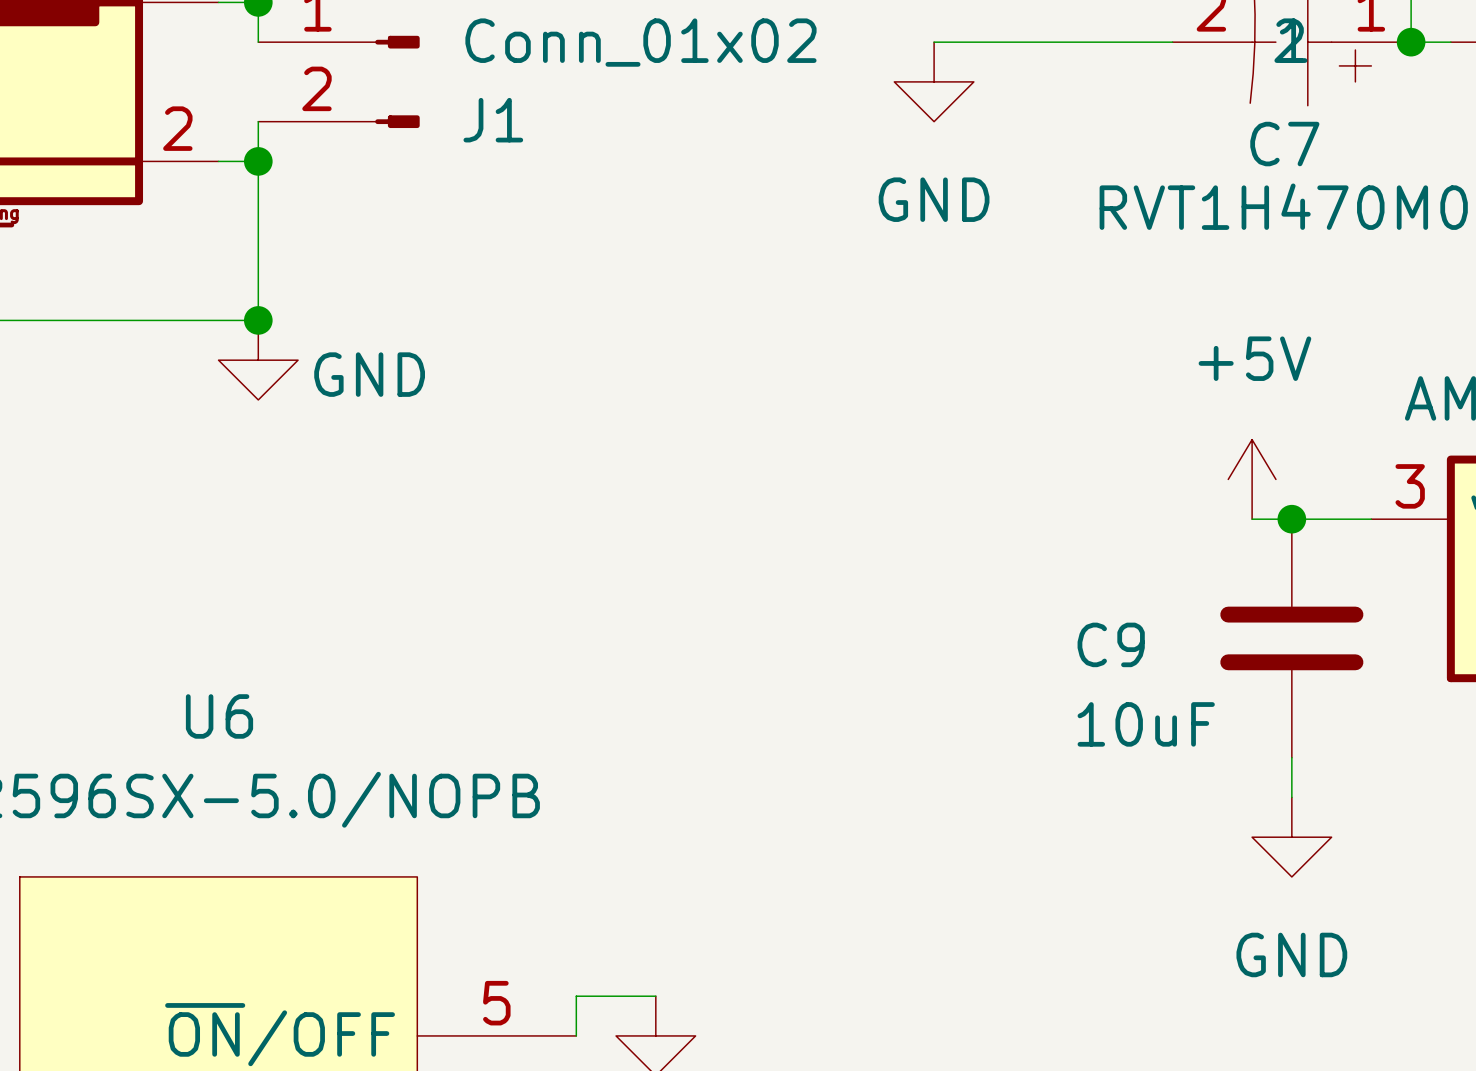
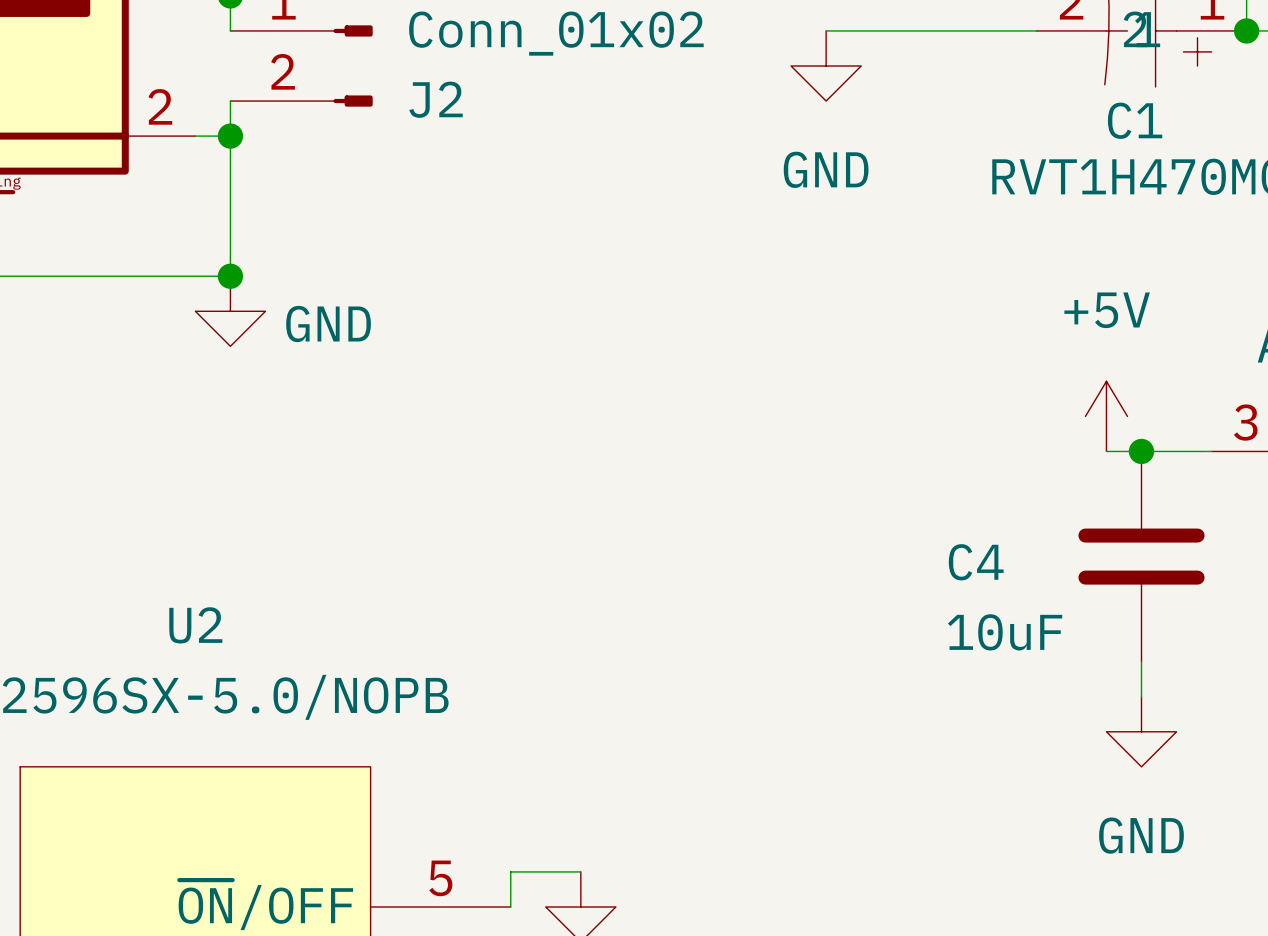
J1 name: J1 (493, 120) -> J2 (436, 99)
C7 name: C7 (1284, 144) -> C1 (1135, 120)
C9 name: C9 (1111, 644) -> C4 (976, 562)
U6 name: U6 (219, 716) -> U2 (195, 625)

